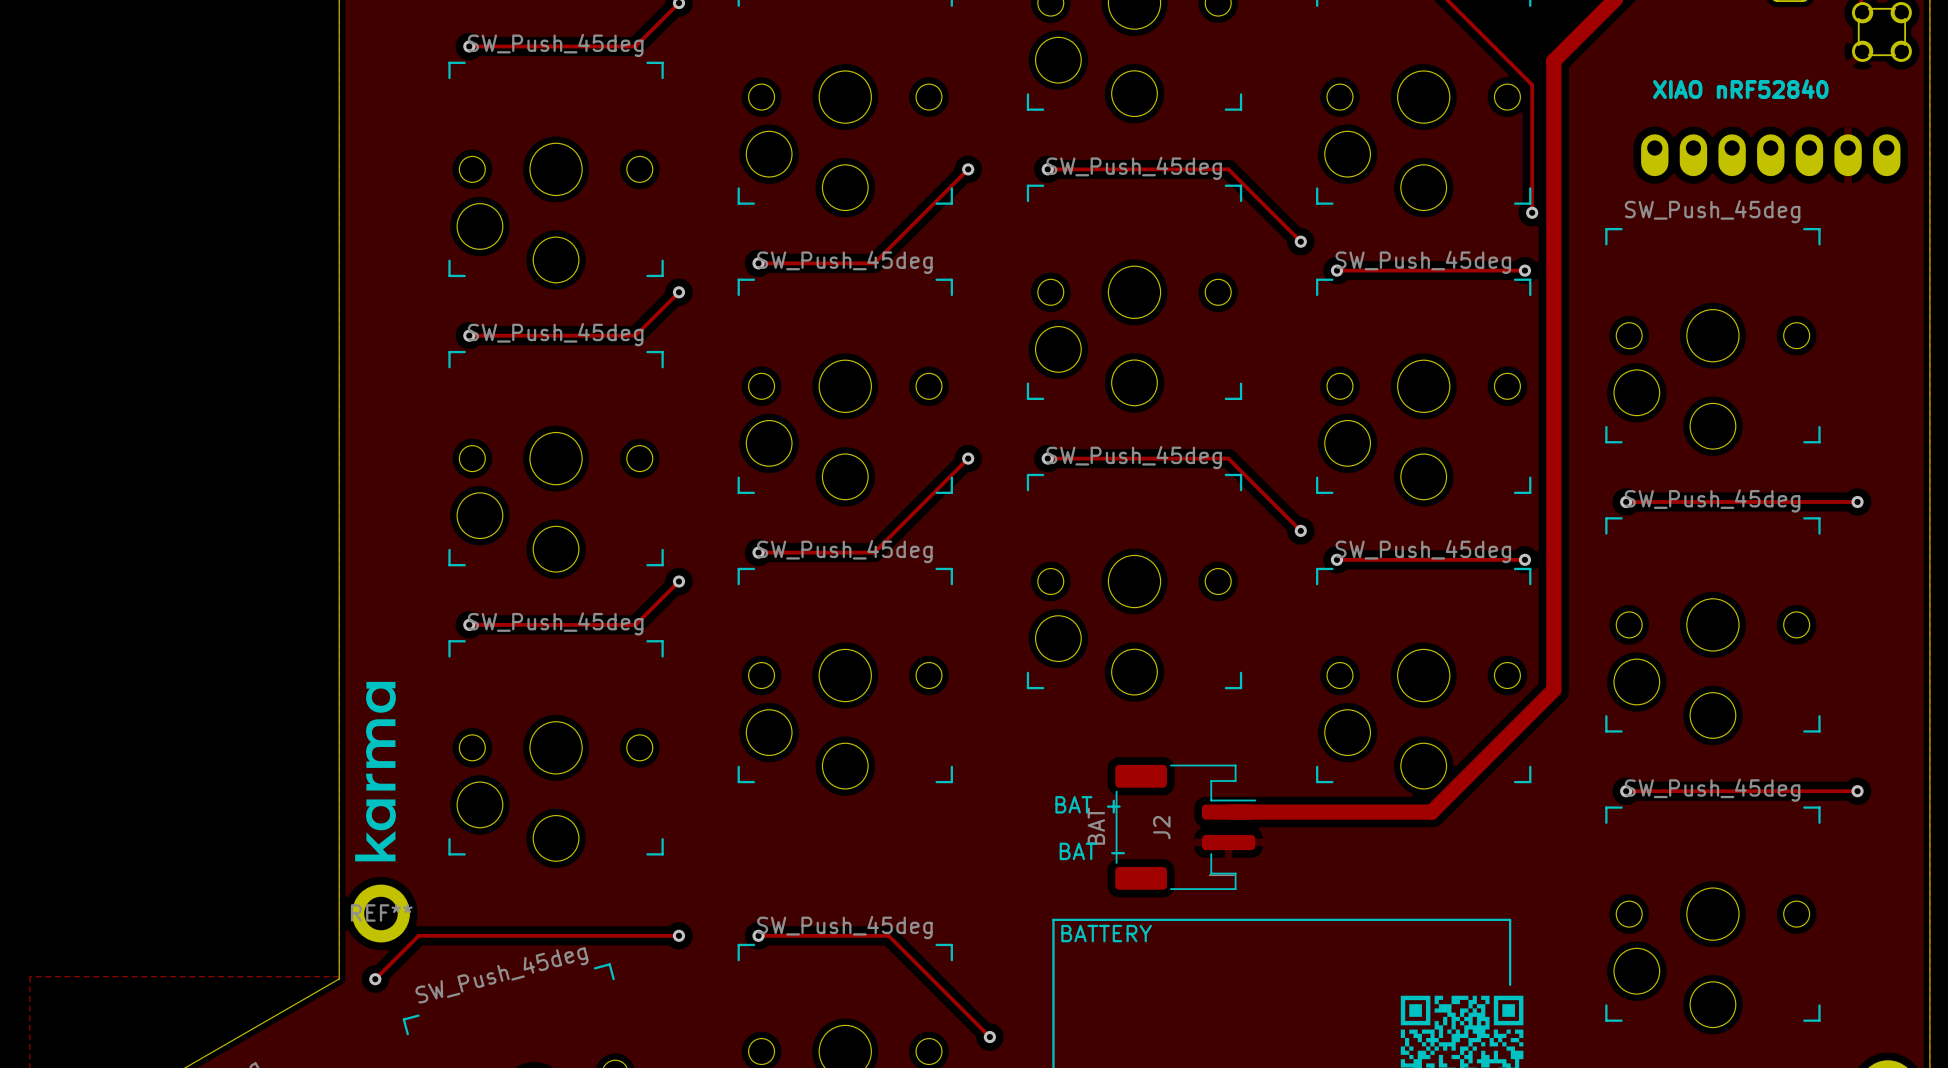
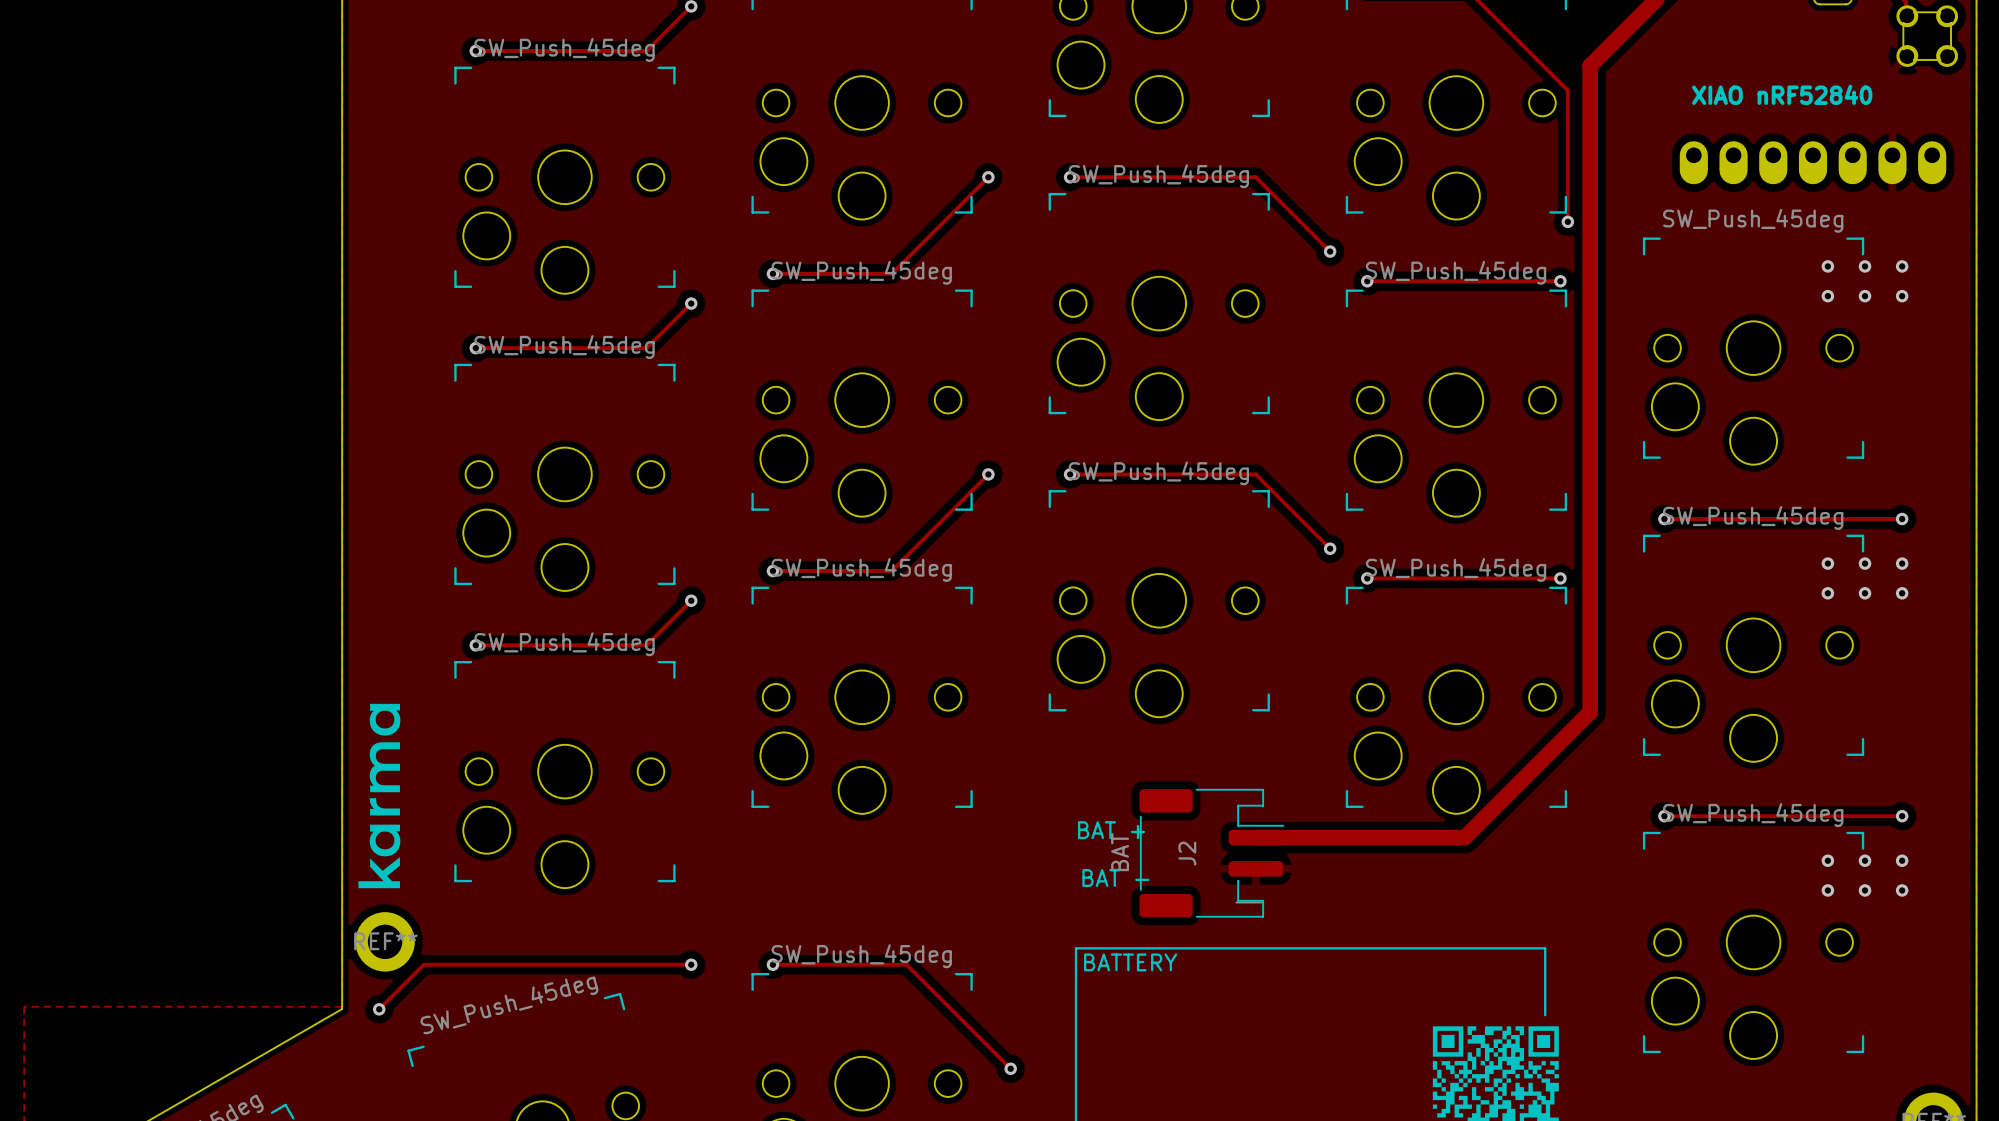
via: none -> (1827, 266)
via: none -> (1865, 266)
via: none -> (1902, 266)
via: none -> (1827, 296)
via: none -> (1865, 296)
via: none -> (1902, 296)
via: none -> (1827, 563)
via: none -> (1865, 563)
via: none -> (1902, 563)
via: none -> (1827, 593)
via: none -> (1865, 593)
via: none -> (1902, 593)
via: none -> (1827, 860)
via: none -> (1865, 860)
via: none -> (1902, 860)
via: none -> (1827, 890)
via: none -> (1865, 890)
via: none -> (1902, 890)

